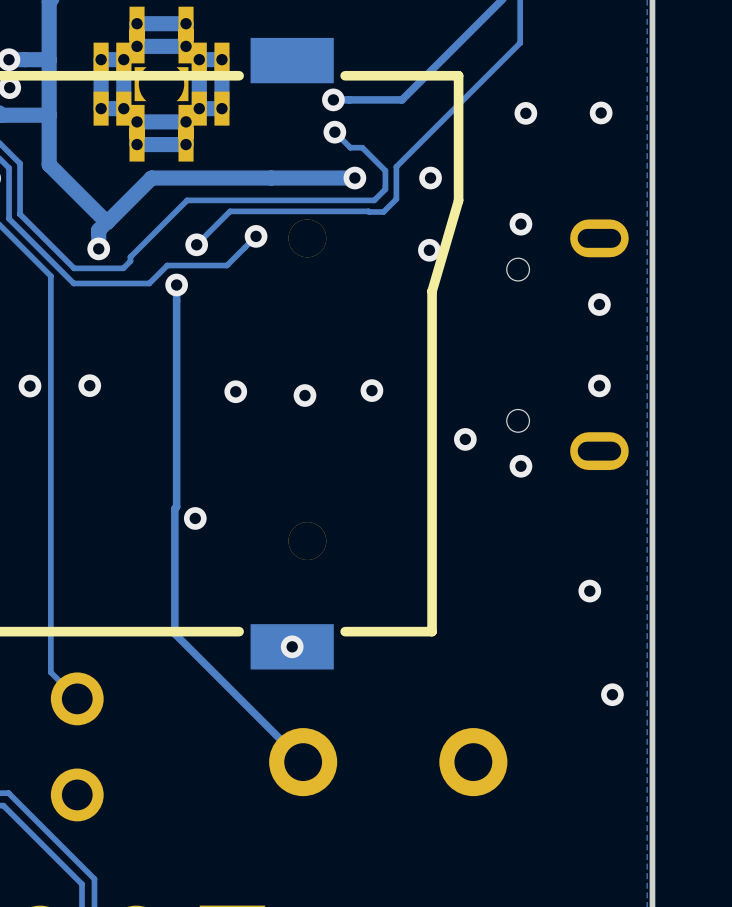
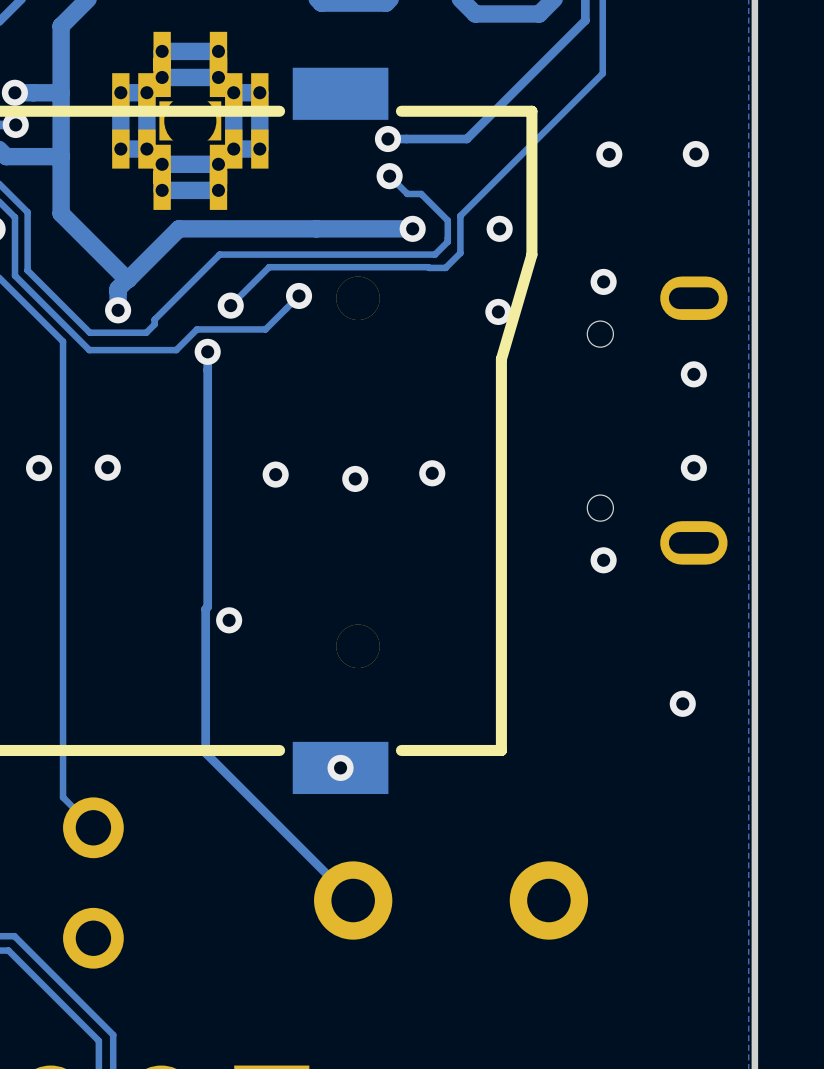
via: (465, 439) -> none
via: (612, 694) -> none

